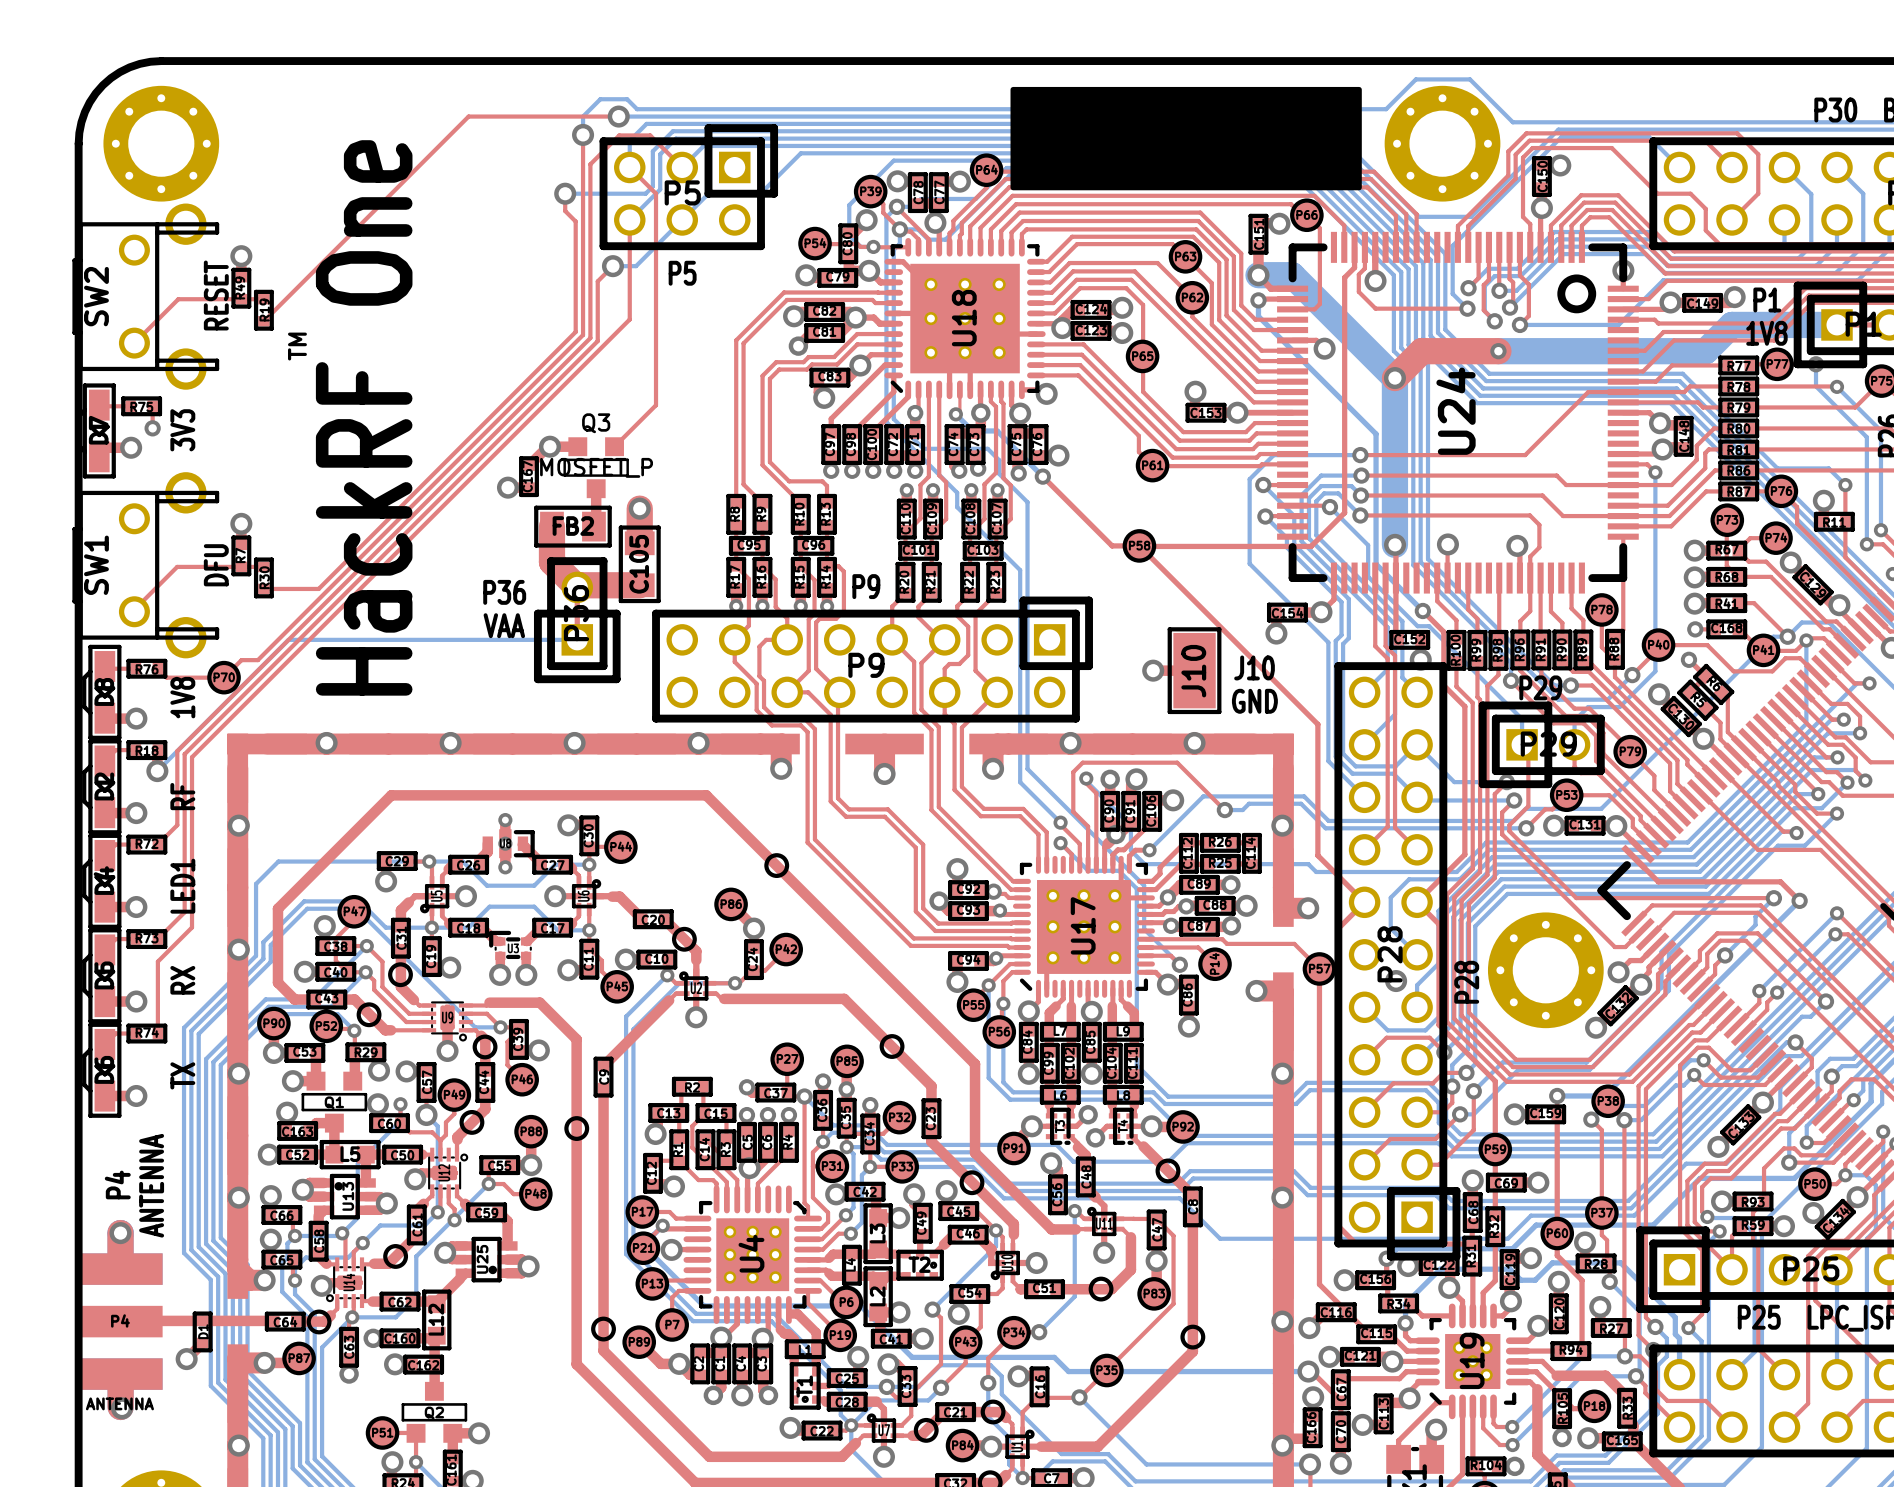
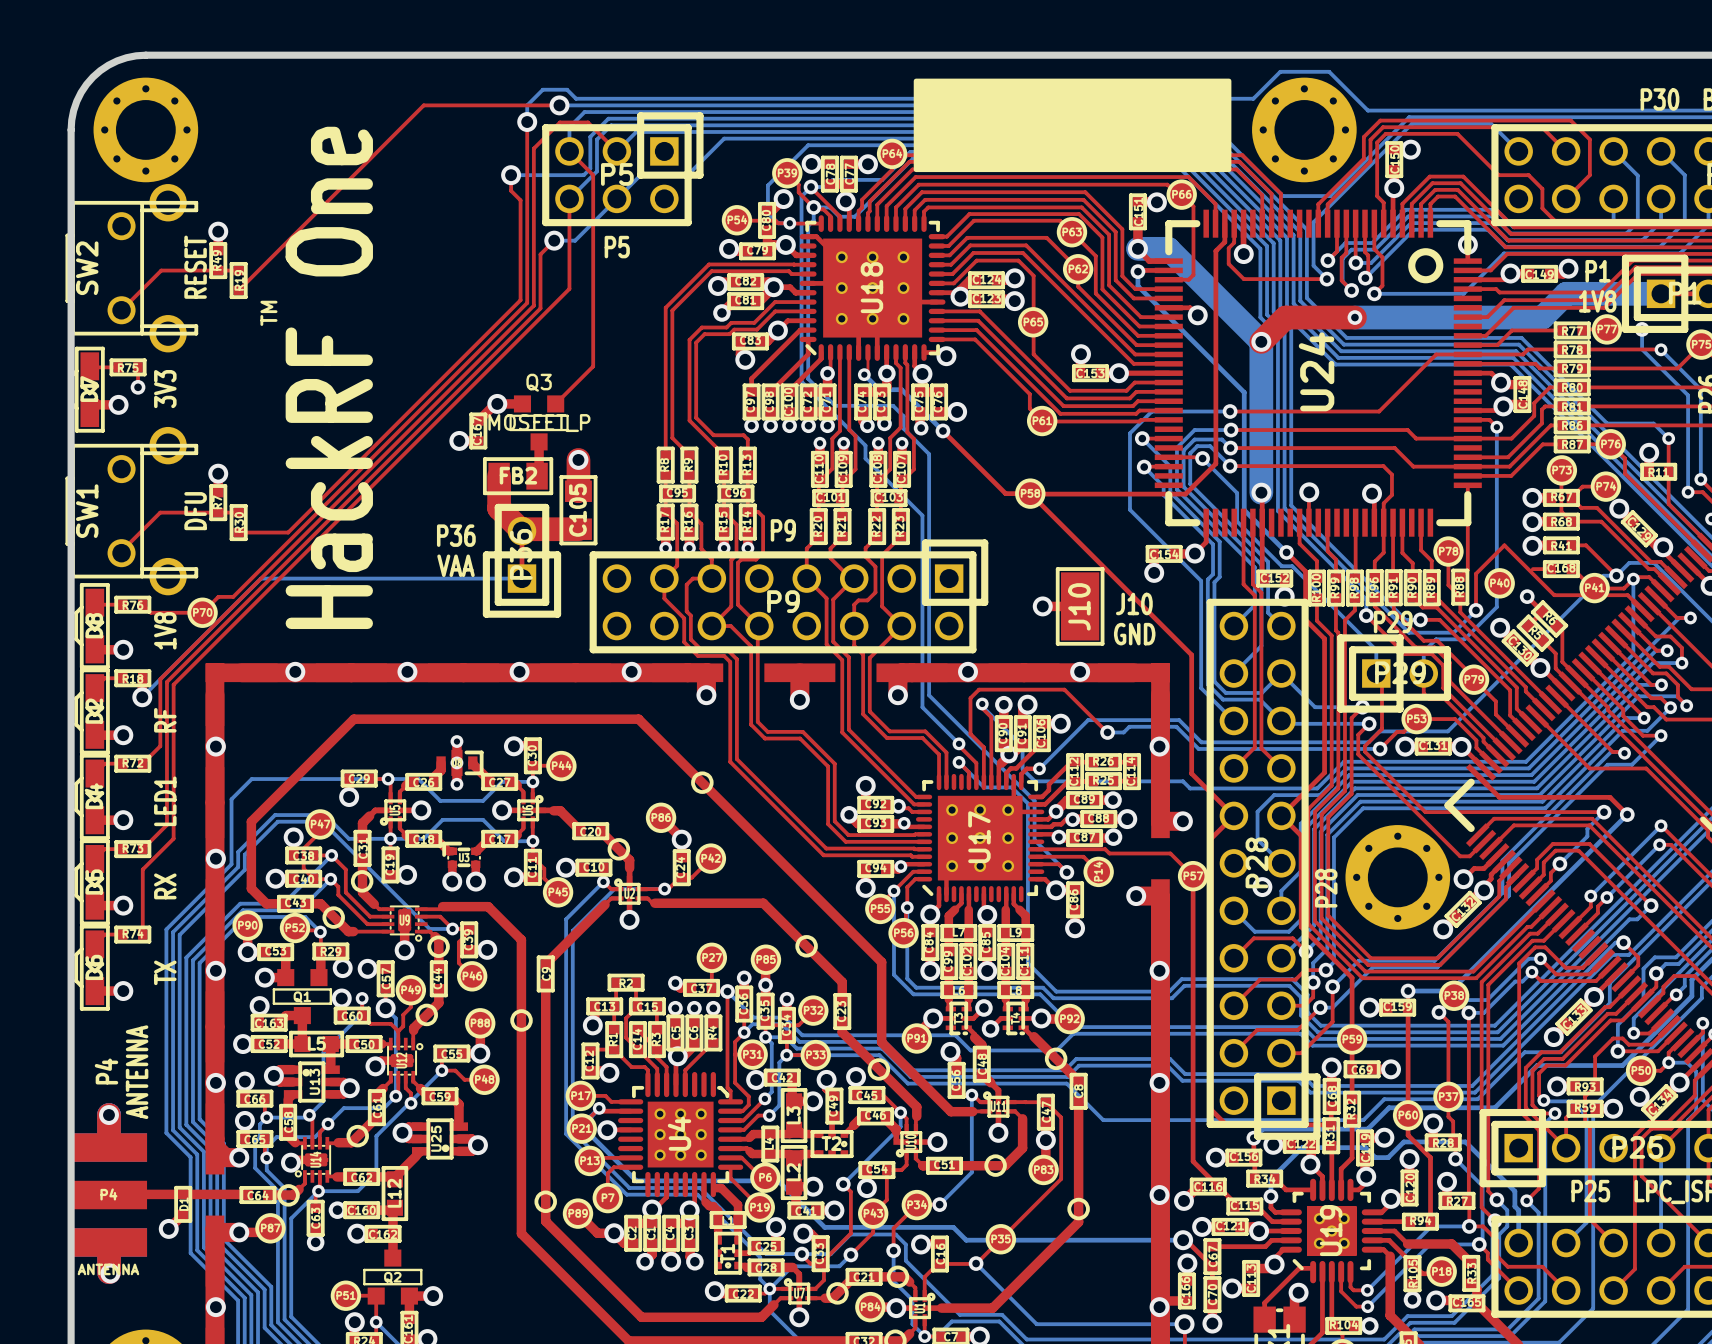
via: (1695, 629) -> none
top track: (1785, 658) (1772, 671) (1733, 671) (1707, 645) (1658, 645) (1658, 648) (1632, 675) -> (1614, 595) (1554, 595) (1504, 545) (1476, 573) (1476, 610)

